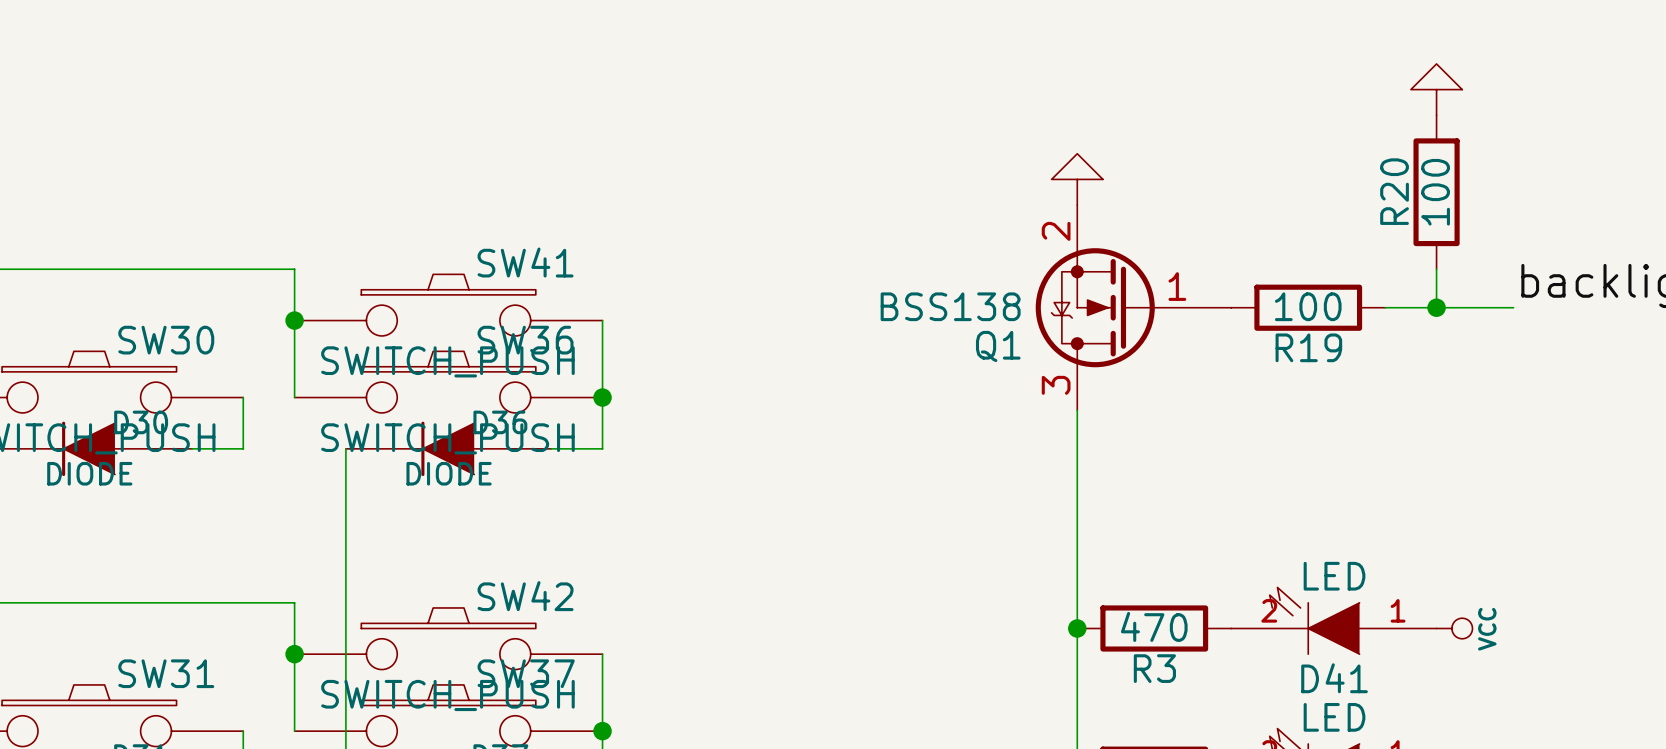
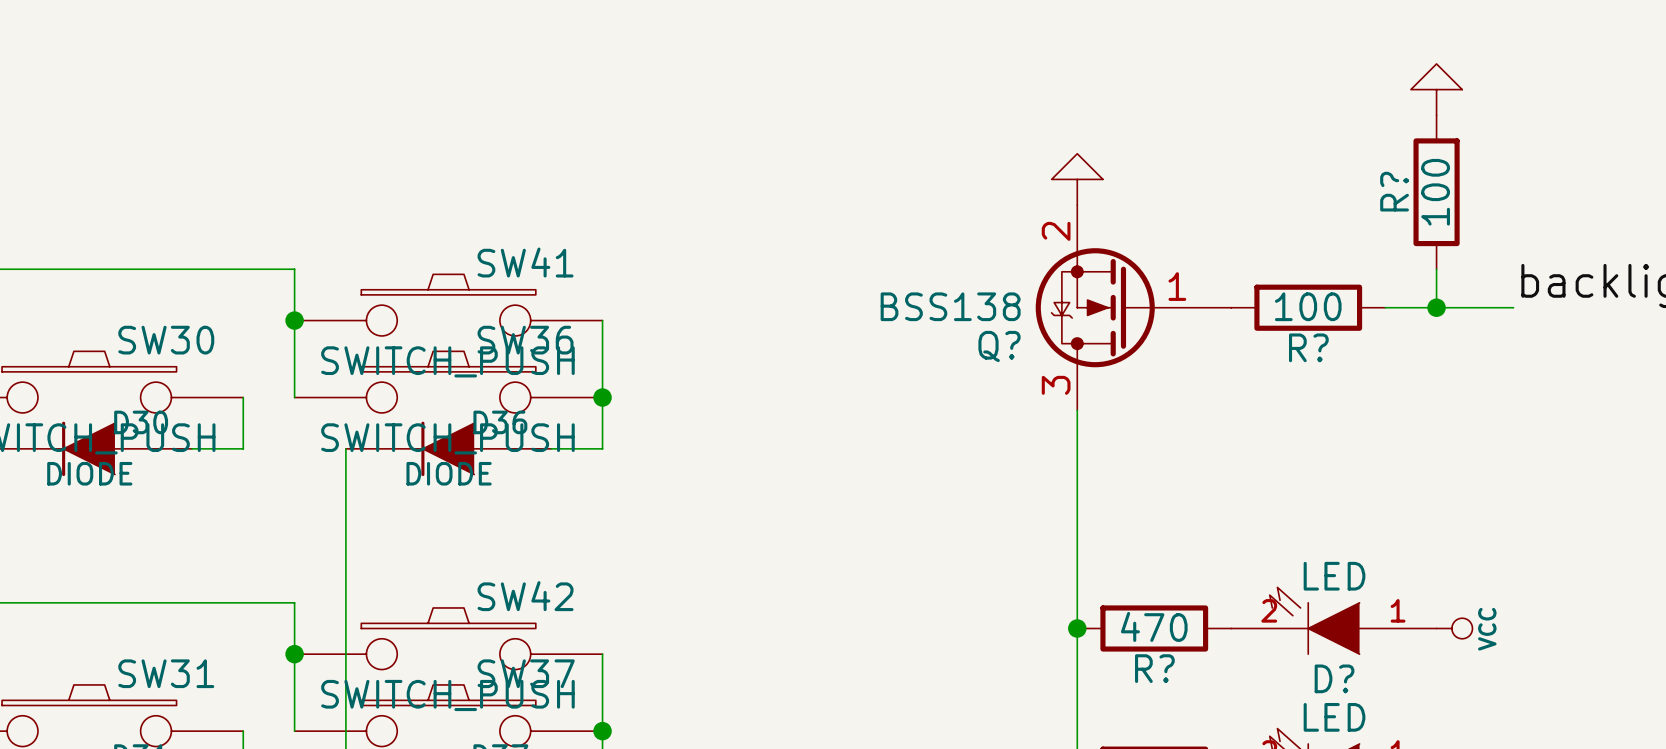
R20 name: R20 (1394, 191) -> R? (1394, 191)
Q1 name: Q1 (998, 346) -> Q? (999, 346)
R19 name: R19 (1308, 347) -> R? (1308, 347)
R3 name: R3 (1154, 668) -> R? (1154, 668)
D41 name: D41 (1334, 678) -> D? (1334, 678)

